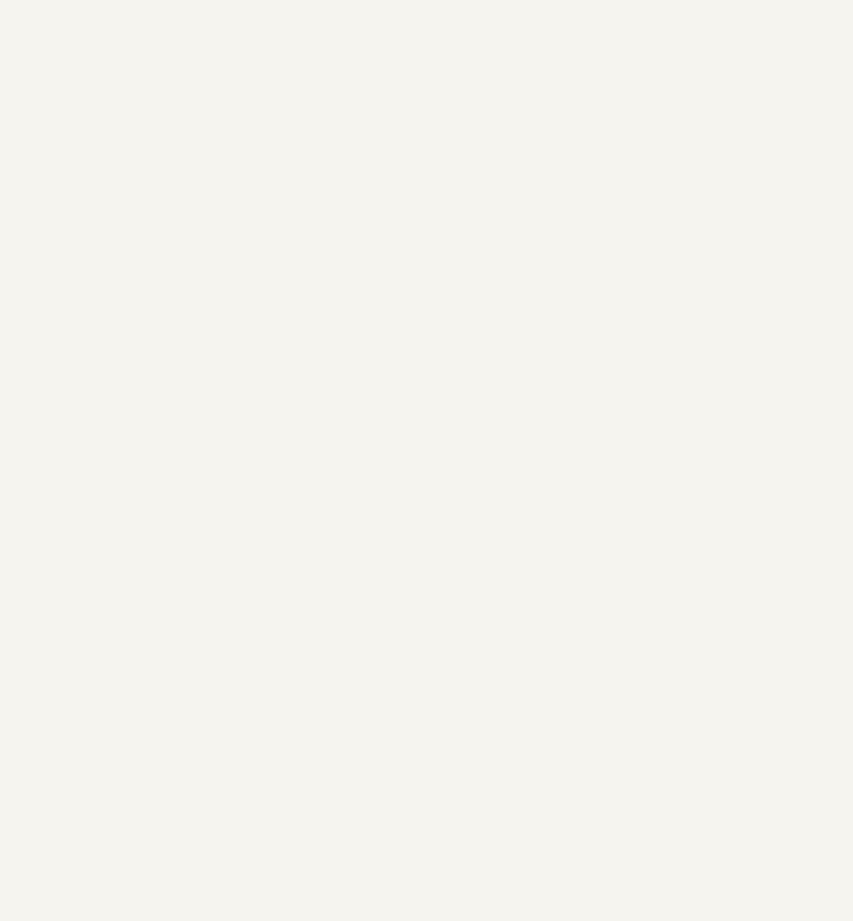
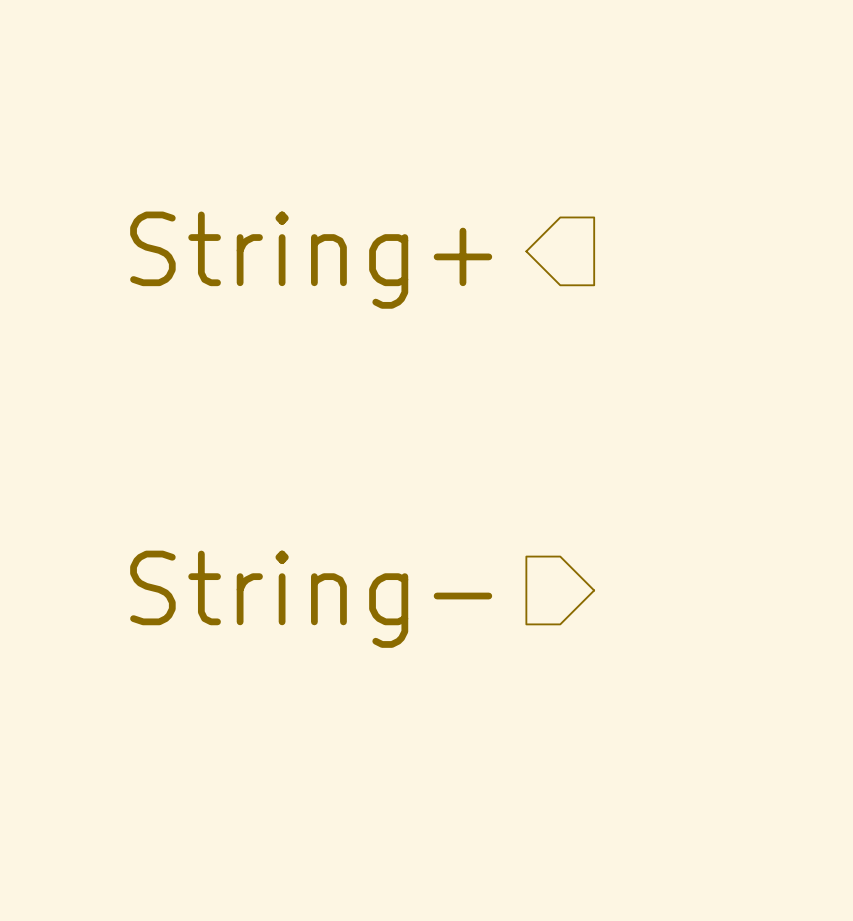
hierarchical label: none -> String+ (311, 260)
hierarchical label: none -> String- (311, 599)

